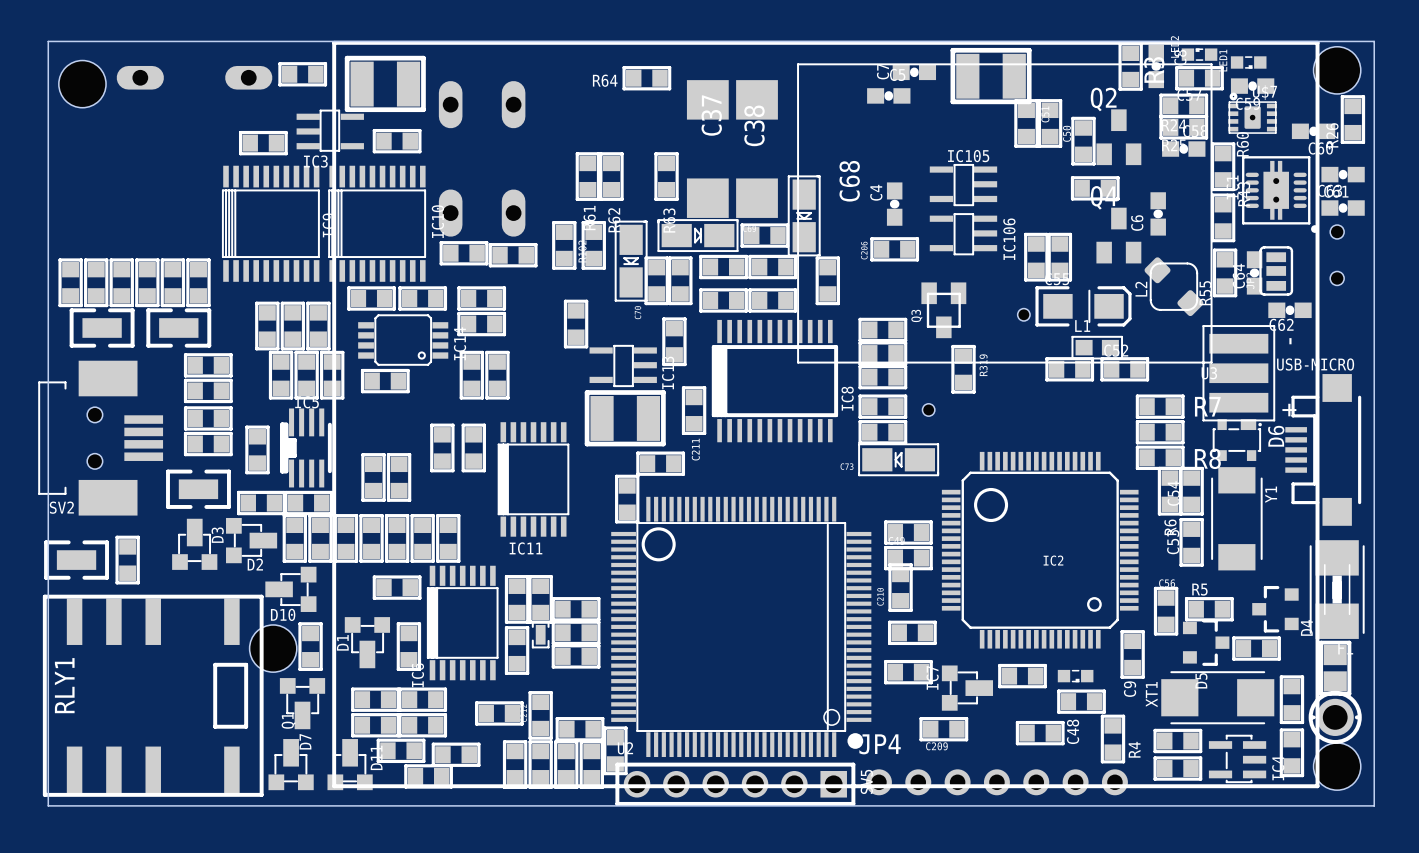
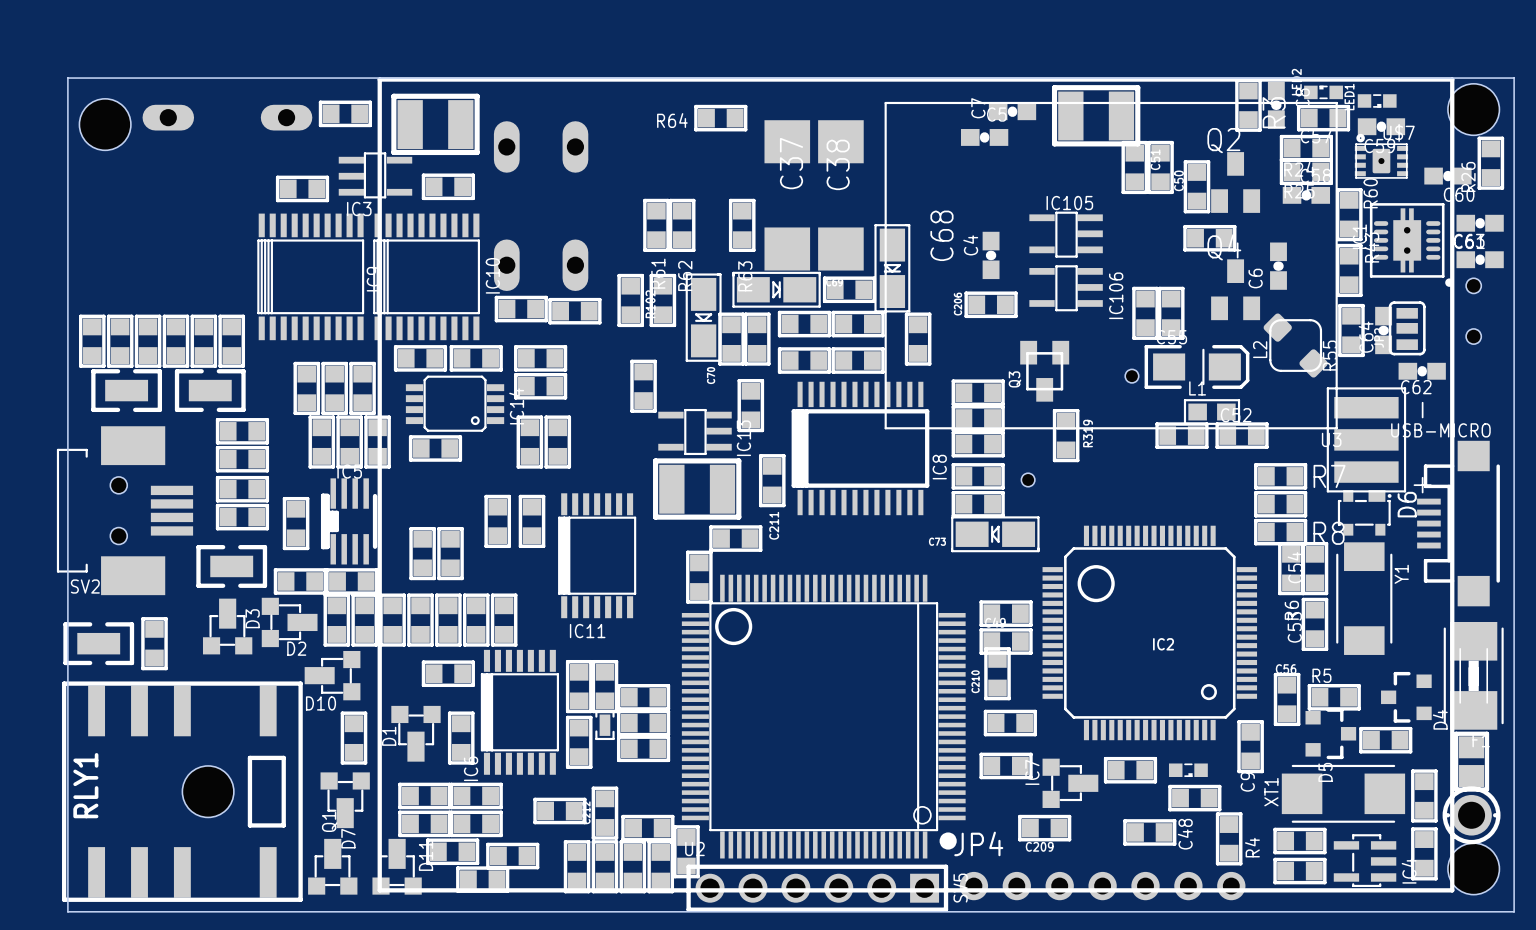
part position: (273, 648) -> (208, 791)

